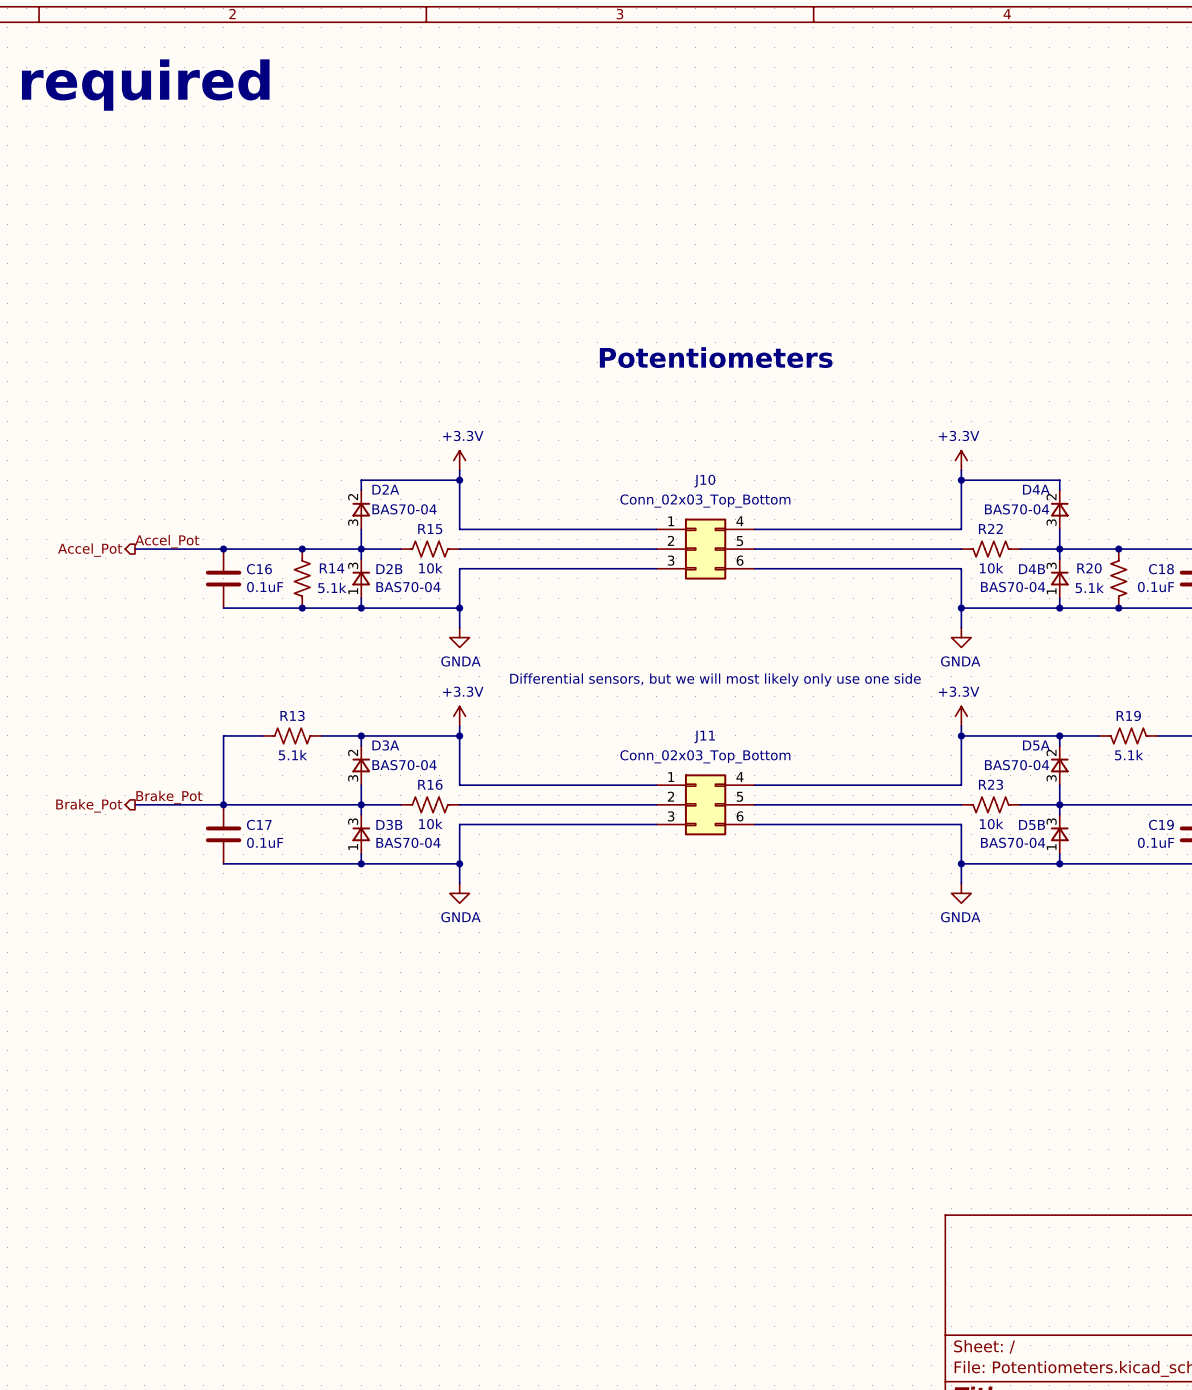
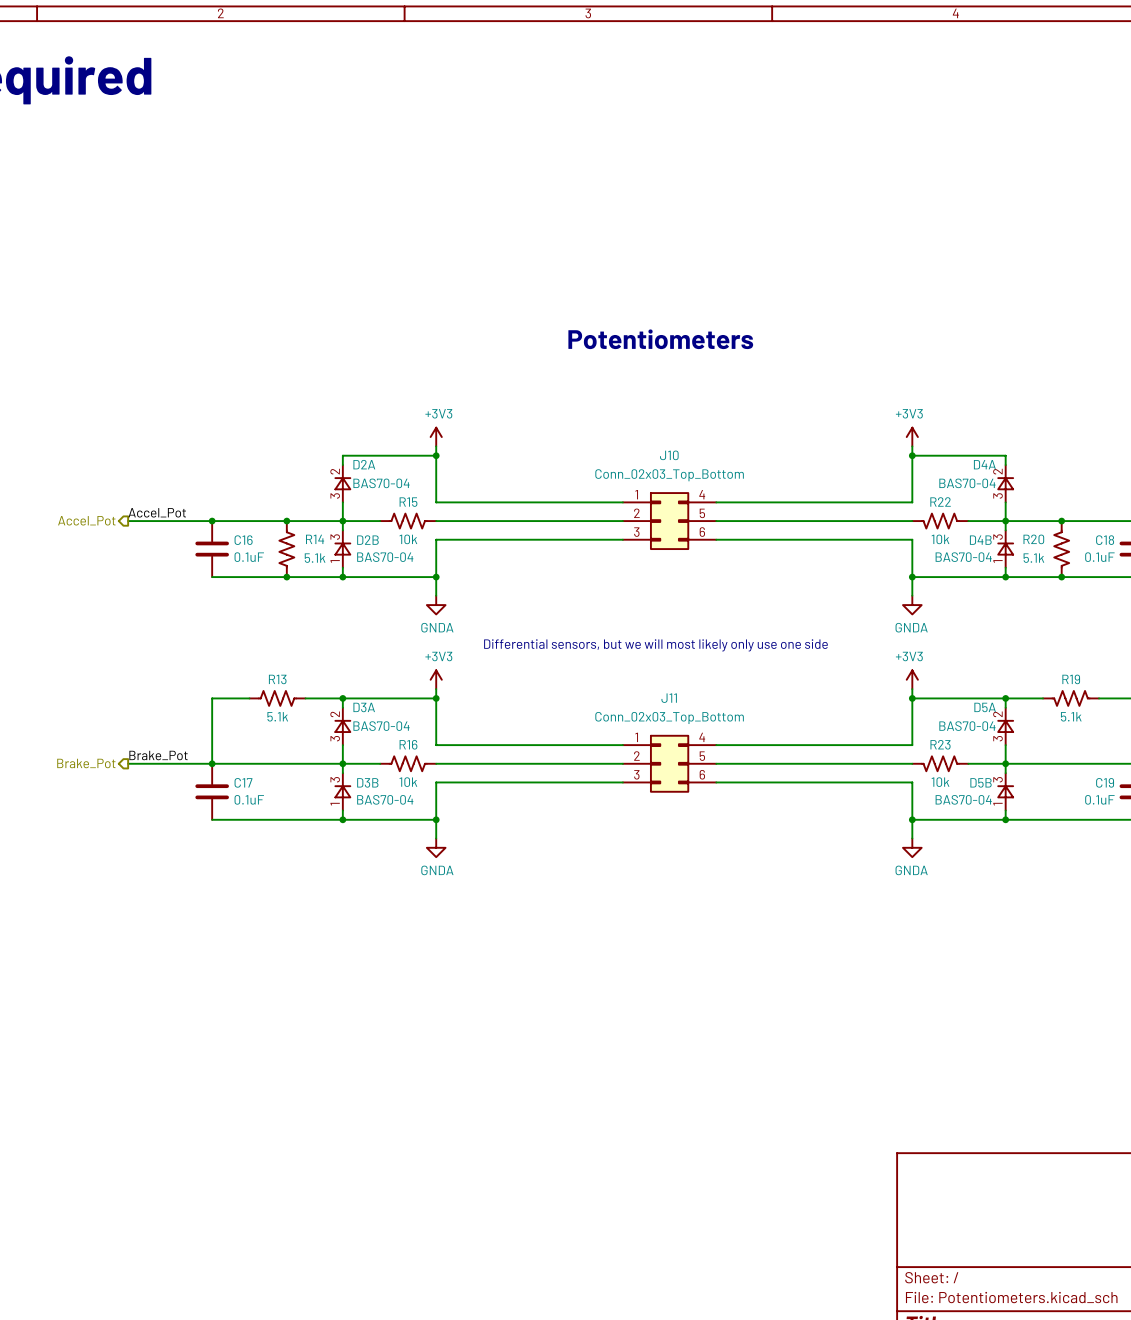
power symbol: +3.3V (459, 460) -> +3V3 (436, 437)
power symbol: +3.3V (961, 460) -> +3V3 (912, 437)
power symbol: +3.3V (459, 716) -> +3V3 (436, 679)
power symbol: +3.3V (961, 716) -> +3V3 (912, 679)

